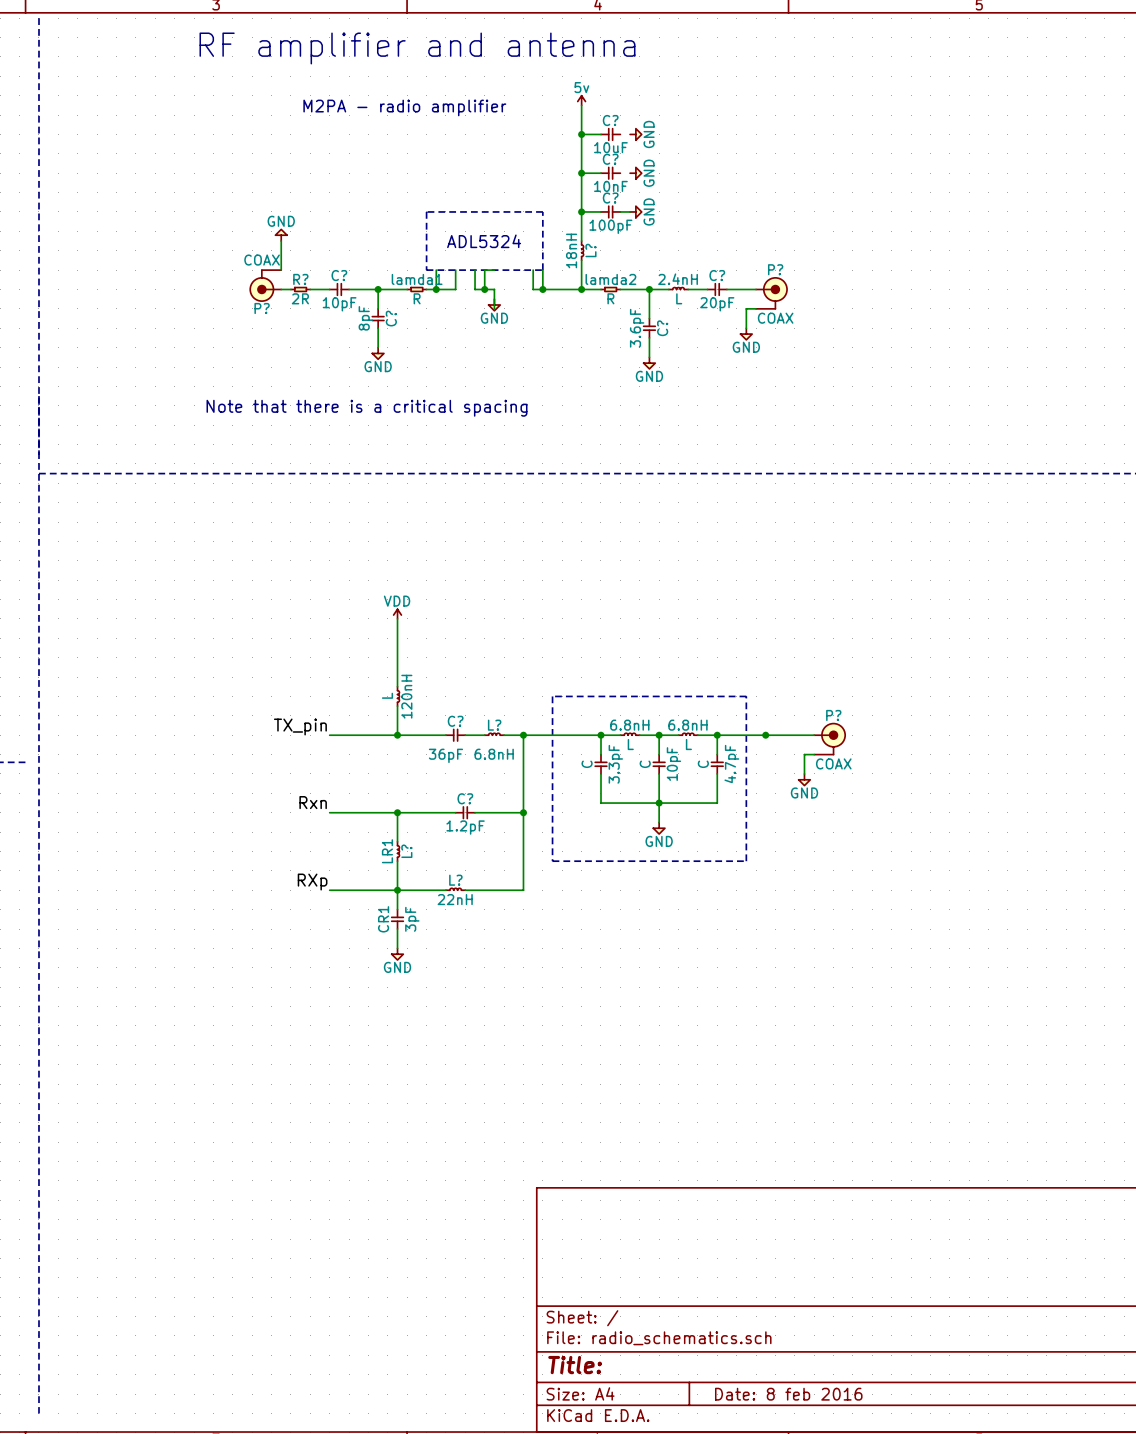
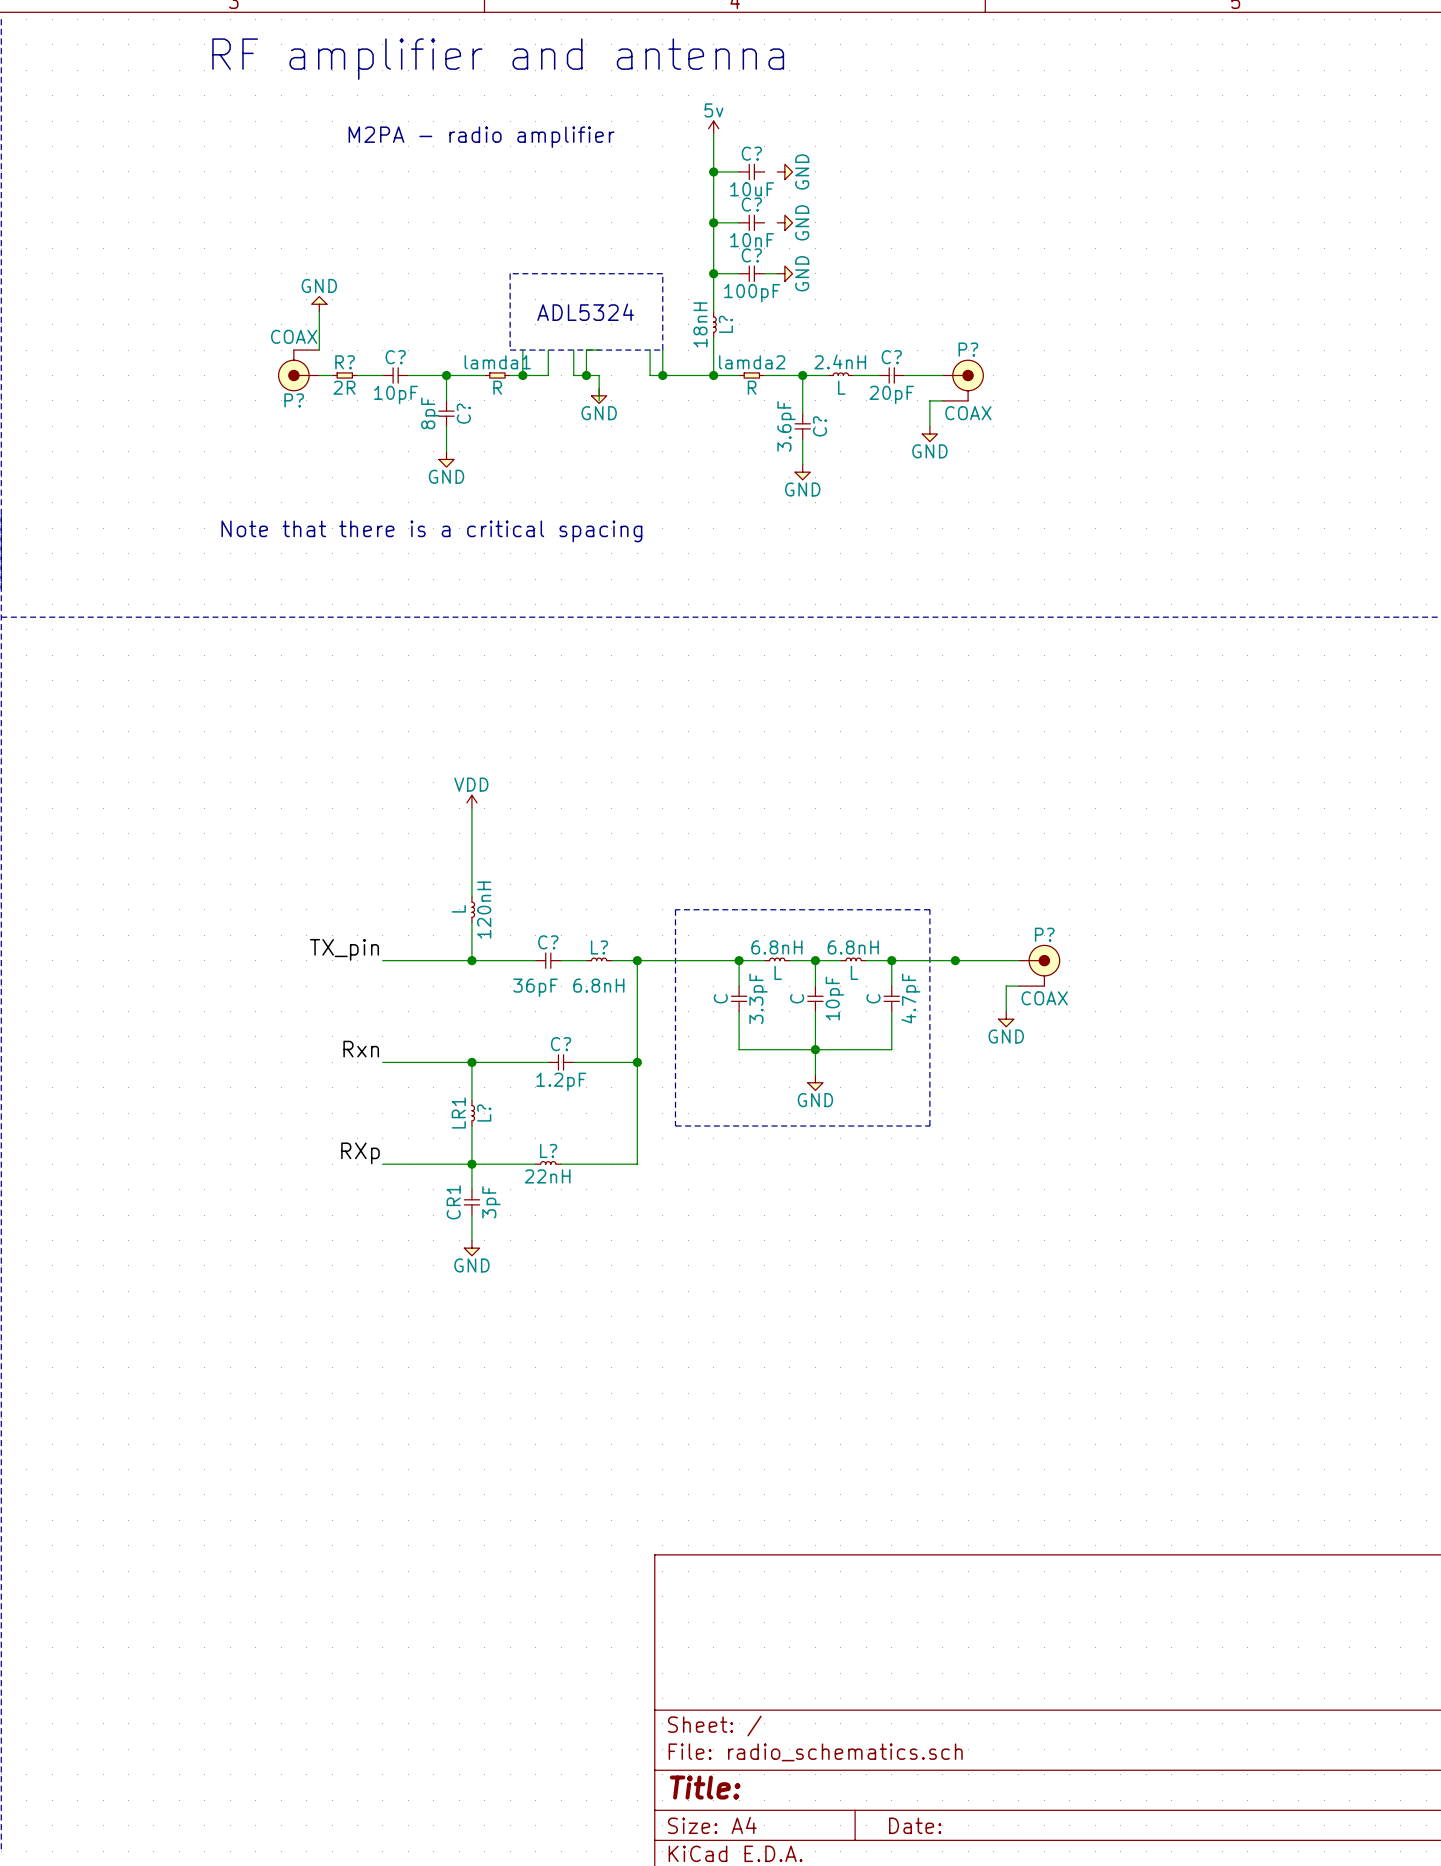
title block: Date: 8 feb 2016 (788, 1394) -> Date: (915, 1825)

